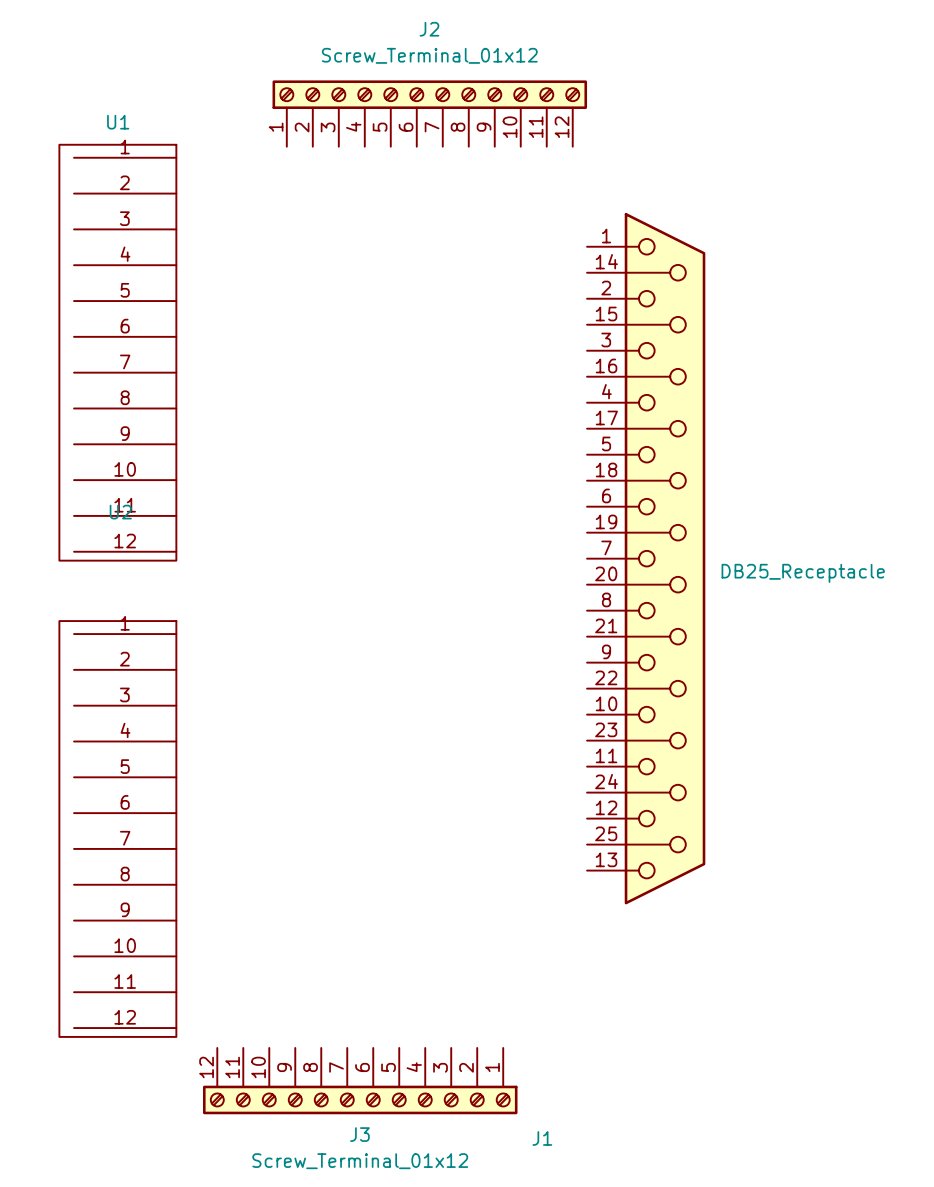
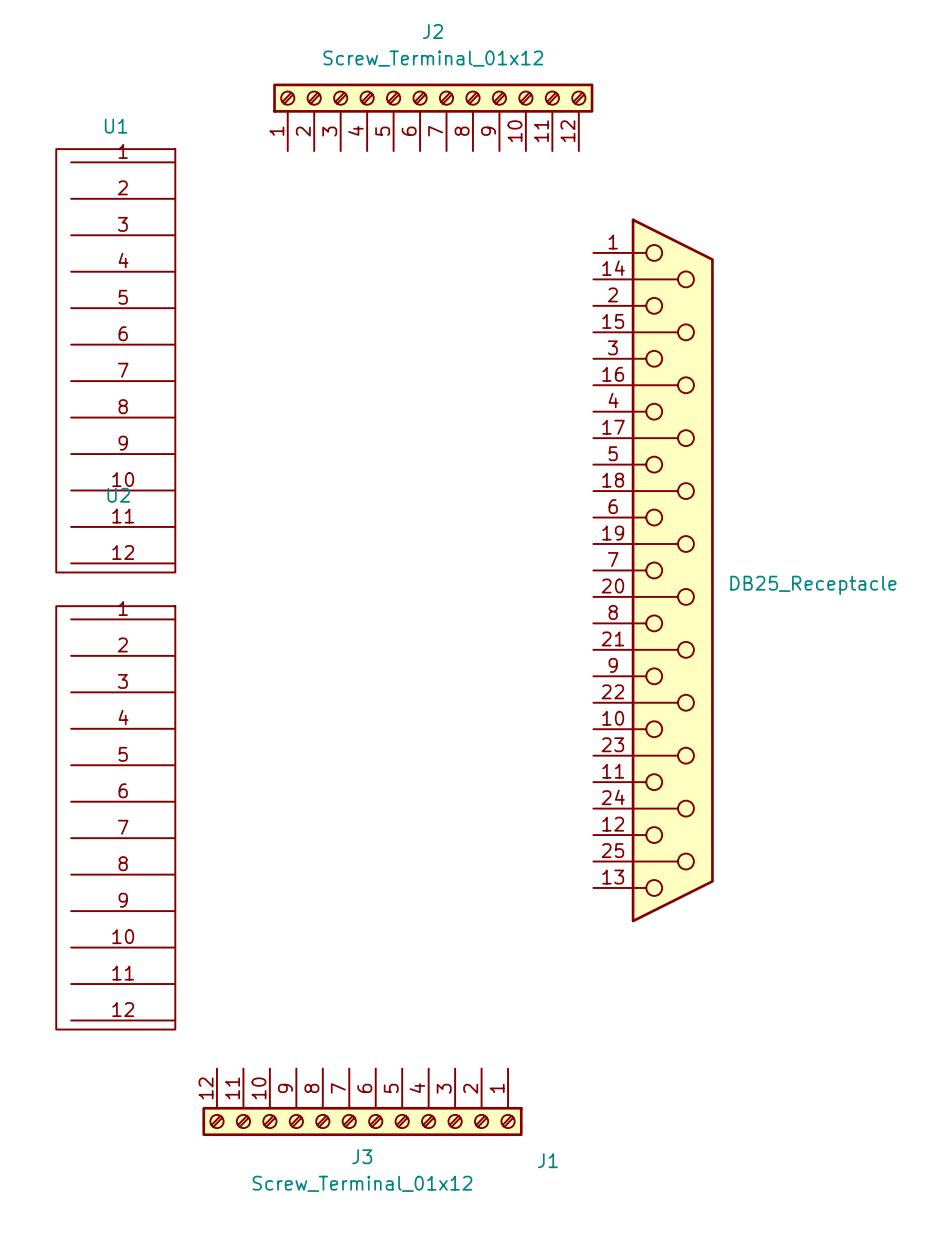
U2 position: (117, 828) -> (115, 817)

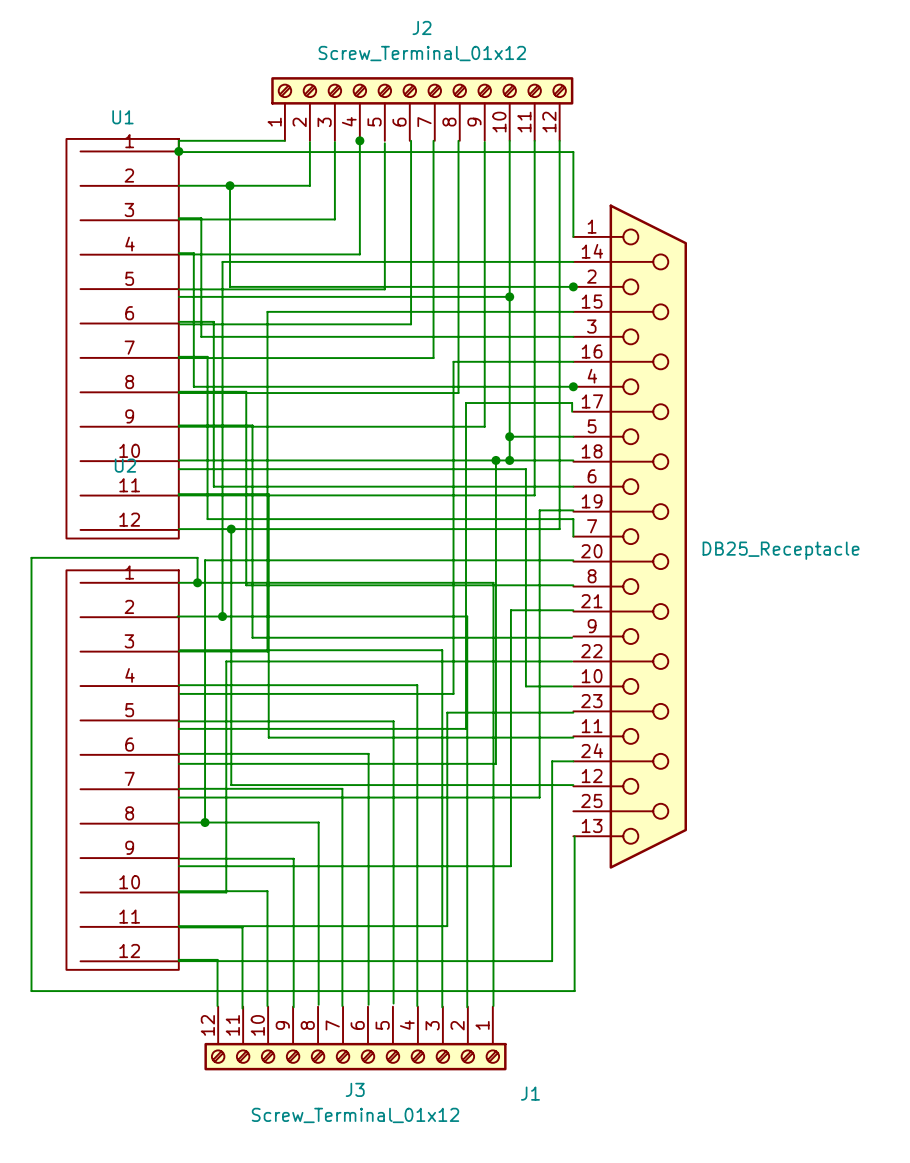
wire: none -> (359, 139) (359, 254) (180, 254)
wire: none -> (284, 140) (178, 140) (178, 152) (573, 152) (573, 236)
junction: none -> (359, 140)
wire: none -> (411, 140) (411, 324) (180, 324)
wire: none -> (433, 140) (433, 358) (178, 358)
wire: none -> (458, 140) (458, 393) (178, 393)
wire: none -> (509, 140) (509, 460)
wire: none -> (534, 140) (534, 495) (178, 495) (268, 494) (268, 737) (573, 737)
wire: none -> (559, 140) (559, 529) (178, 529)
wire: none -> (309, 142) (309, 185) (178, 185)
wire: none -> (334, 142) (334, 219) (178, 219)
wire: none -> (484, 142) (484, 426) (178, 426)
wire: none -> (384, 143) (384, 289) (178, 289)
junction: none -> (178, 151)
wire: none -> (230, 185) (230, 286) (574, 286)
junction: none -> (230, 185)
wire: none -> (178, 218) (201, 218) (201, 336) (573, 336)
wire: none -> (178, 253) (193, 253) (193, 386) (574, 386)
wire: none -> (573, 261) (222, 261) (222, 616)
junction: none -> (573, 286)
wire: none -> (178, 296) (509, 296)
junction: none -> (509, 296)
wire: none -> (573, 311) (267, 311) (267, 651) (178, 651)
wire: none -> (178, 321) (213, 321) (213, 486) (573, 486)
wire: none -> (178, 356) (207, 356) (207, 519) (573, 519) (573, 536)
wire: none -> (573, 361) (453, 361) (453, 693) (180, 693)
junction: none -> (573, 386)
wire: none -> (178, 391) (246, 391) (246, 585) (573, 585)
wire: none -> (572, 411) (572, 403) (466, 403) (466, 728) (178, 728)
wire: none -> (178, 425) (252, 425) (252, 637) (572, 637)
wire: none -> (509, 436) (573, 436)
junction: none -> (509, 436)
wire: none -> (178, 460) (573, 460)
wire: none -> (495, 460) (495, 763) (178, 763)
junction: none -> (495, 460)
junction: none -> (509, 460)
wire: none -> (178, 469) (525, 469) (525, 686) (572, 686)
wire: none -> (573, 510) (539, 510) (539, 797) (178, 797)
wire: none -> (231, 529) (231, 785) (573, 785)
junction: none -> (231, 529)
wire: none -> (573, 560) (205, 560) (205, 822)
wire: none -> (178, 582) (493, 582) (493, 1006)
wire: none -> (197, 582) (197, 557) (31, 557) (31, 991) (574, 991) (574, 836)
junction: none -> (197, 582)
wire: none -> (573, 610) (510, 610) (510, 866) (178, 866)
wire: none -> (177, 616) (467, 616) (467, 1007)
junction: none -> (222, 616)
wire: none -> (180, 650) (442, 650) (442, 1007)
wire: none -> (572, 661) (226, 661) (226, 892) (178, 892)
wire: none -> (178, 685) (417, 685) (417, 1006)
wire: none -> (573, 712) (447, 712) (447, 926) (178, 926)
wire: none -> (178, 721) (393, 721) (393, 1003)
wire: none -> (178, 753) (368, 753) (368, 1004)
wire: none -> (573, 761) (552, 761) (552, 961) (178, 961)
wire: none -> (178, 788) (342, 788) (342, 1006)
wire: none -> (178, 822) (318, 822) (318, 1004)
junction: none -> (205, 822)
wire: none -> (180, 858) (293, 858) (293, 1007)
wire: none -> (178, 891) (267, 891) (267, 1006)
wire: none -> (180, 927) (242, 927) (242, 1008)
wire: none -> (178, 959) (217, 959) (217, 1006)

